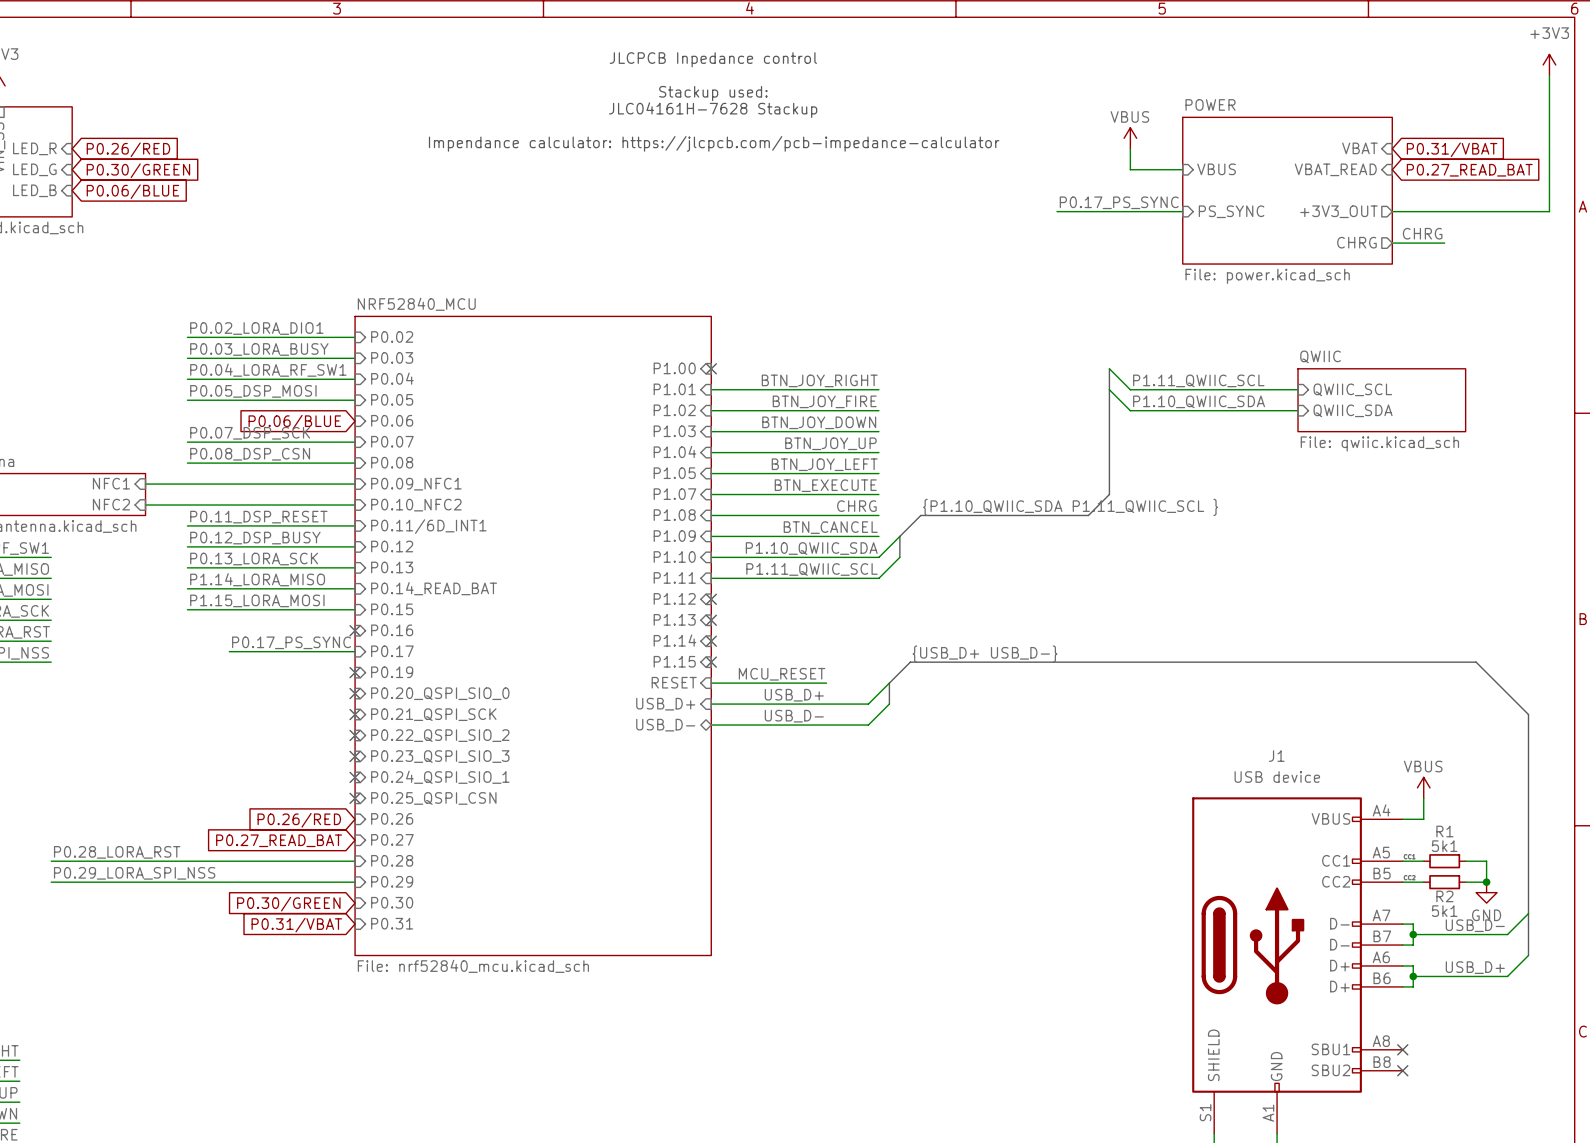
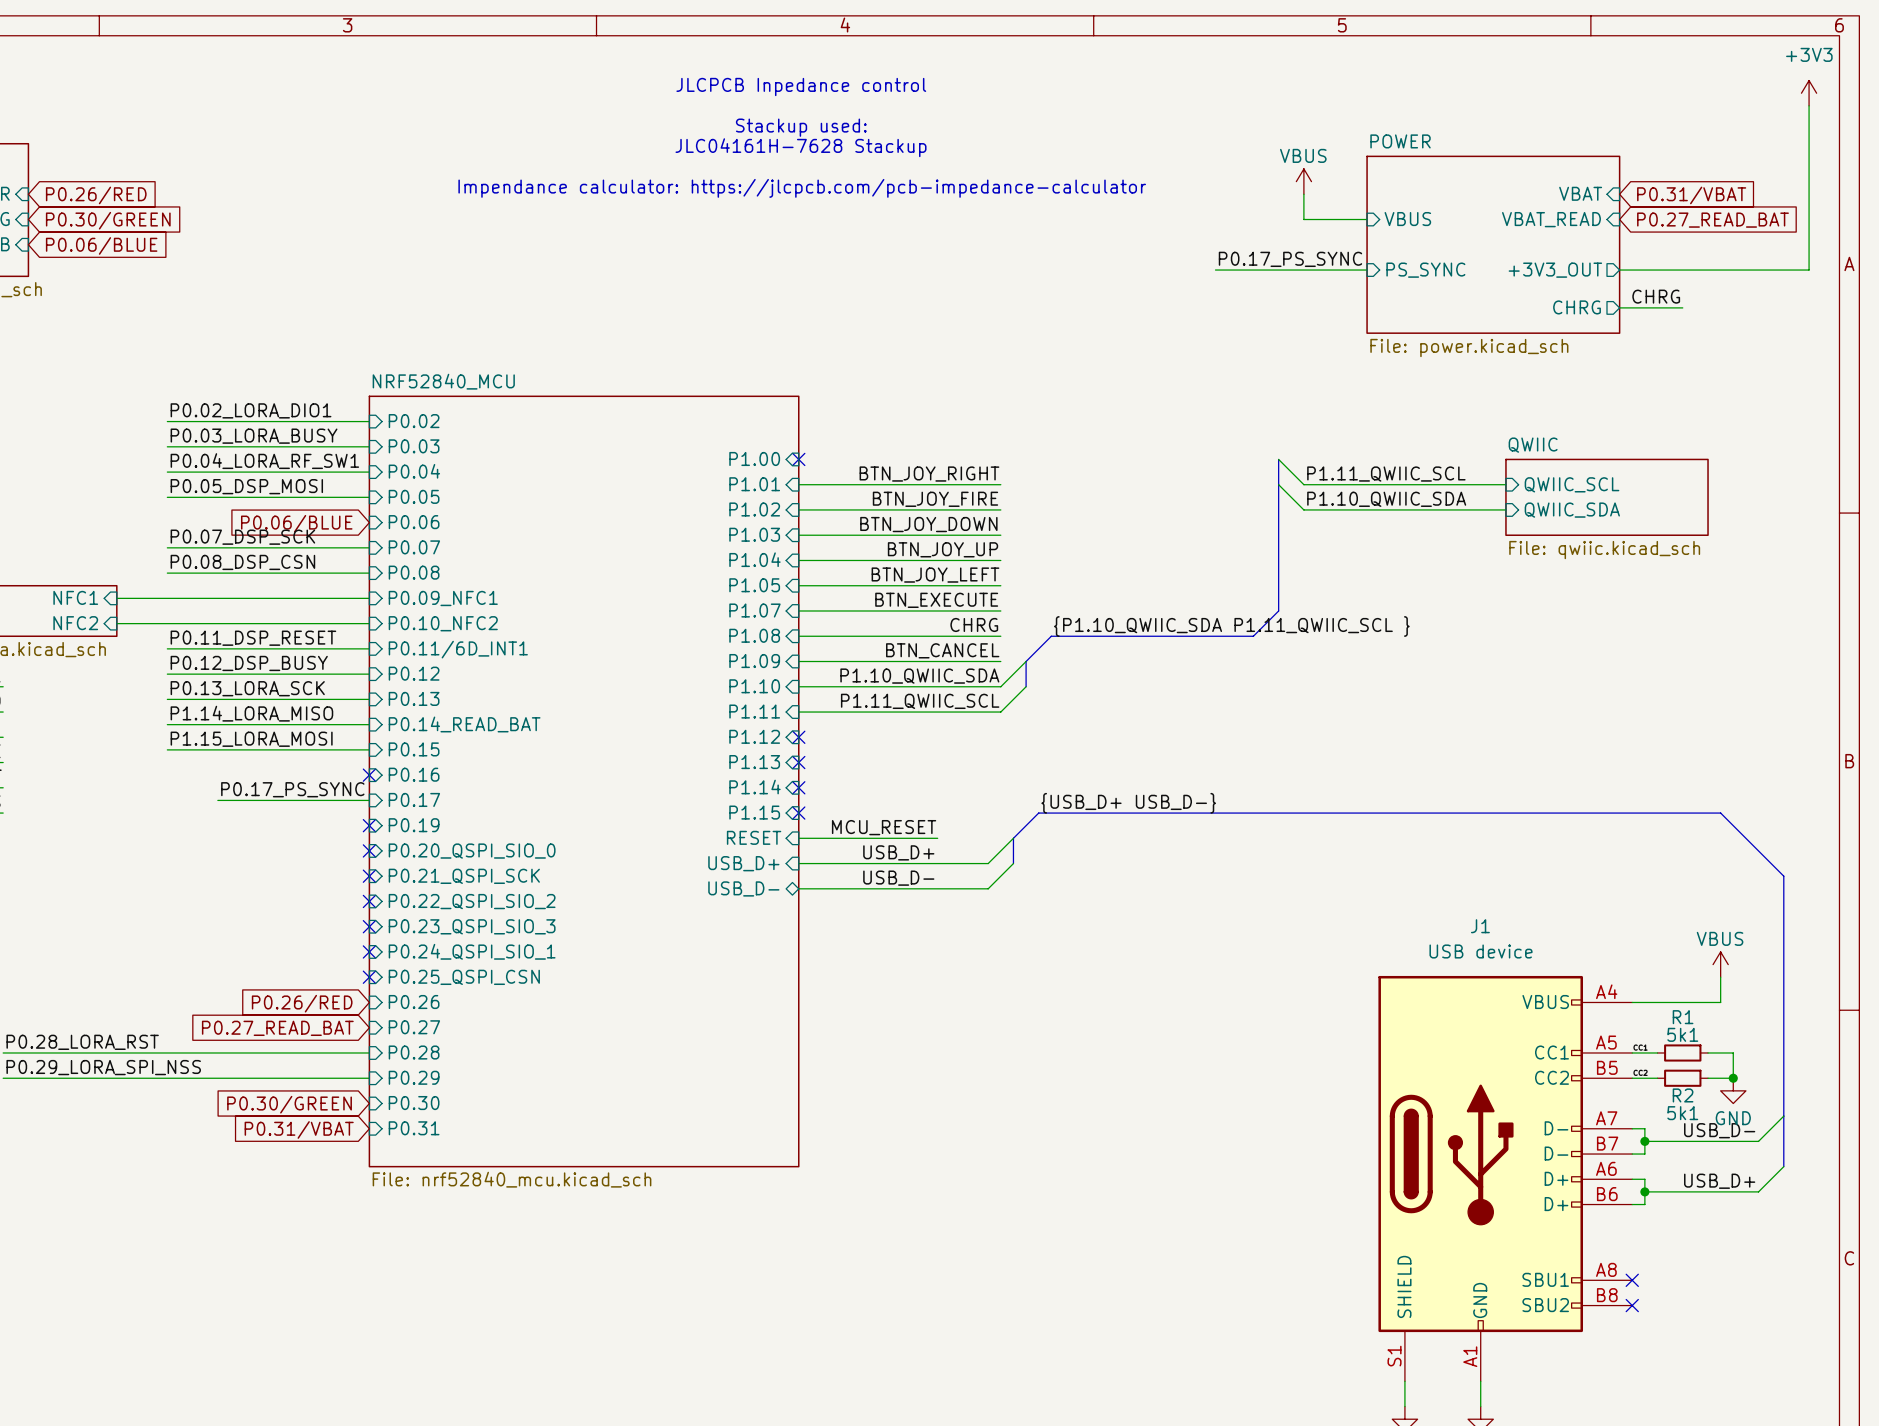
power symbol position: VBUS (1423, 787) -> VBUS (1720, 964)
wire: (1423, 798) (1423, 819) -> (1720, 977) (1720, 1002) (1657, 1002)

